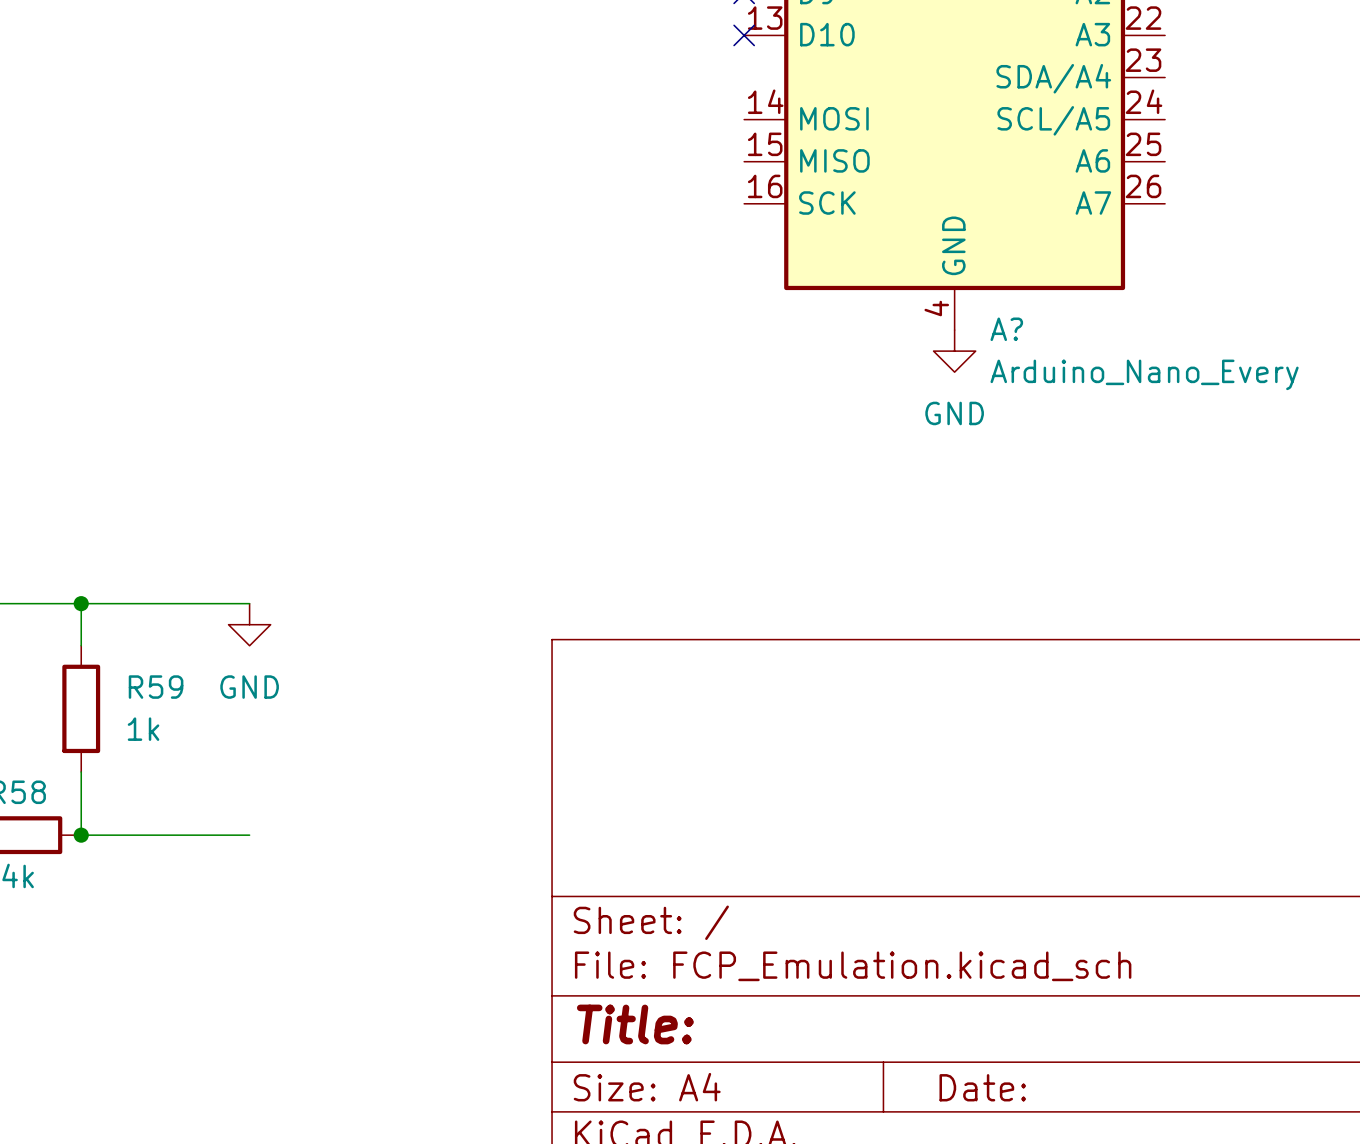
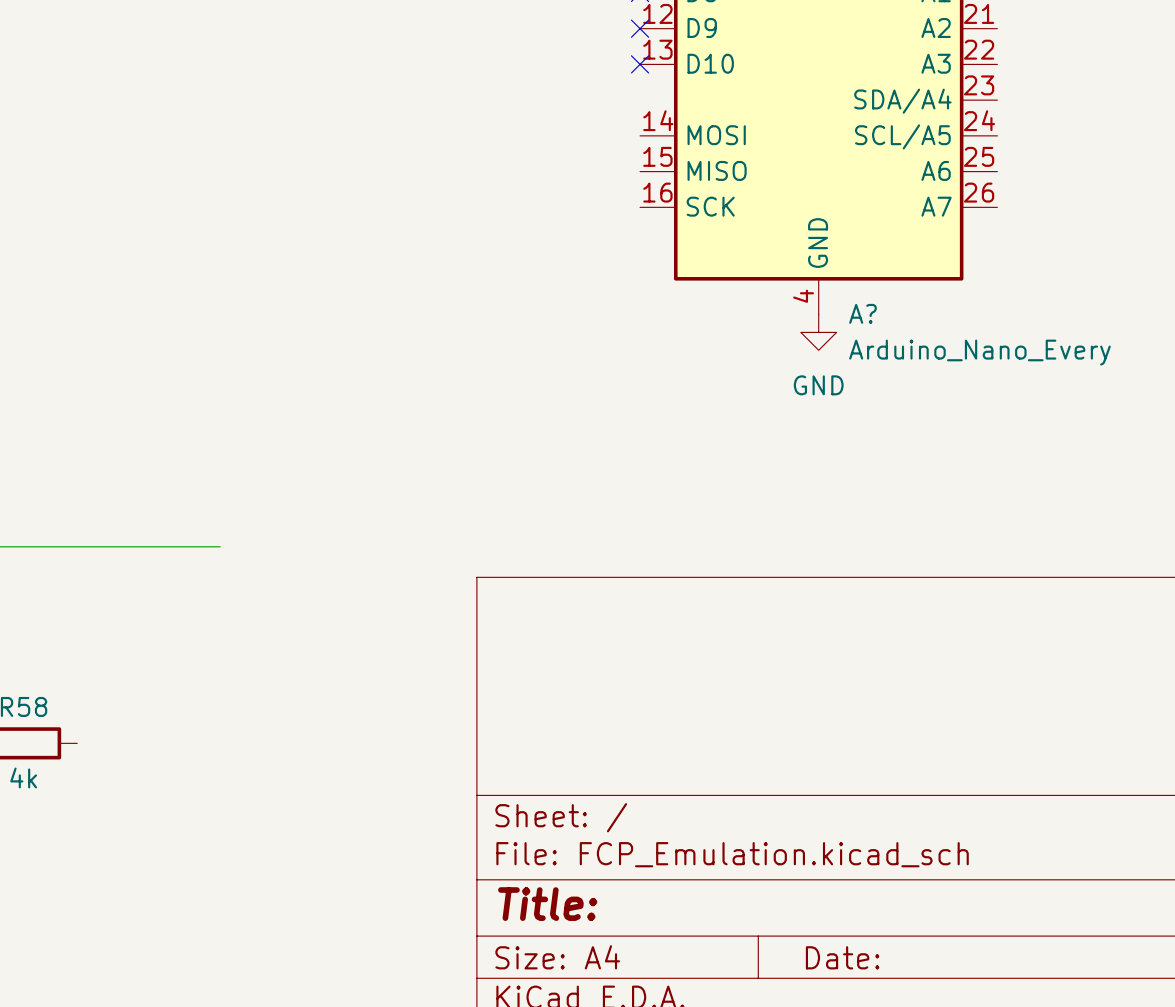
wire: (81, 603) (81, 645) -> none
junction: (81, 603) -> none
power symbol: GND (249, 624) -> none
R59: 1k (81, 708) -> none
wire: (81, 772) (81, 835) (249, 835) -> none
junction: (81, 835) -> none

